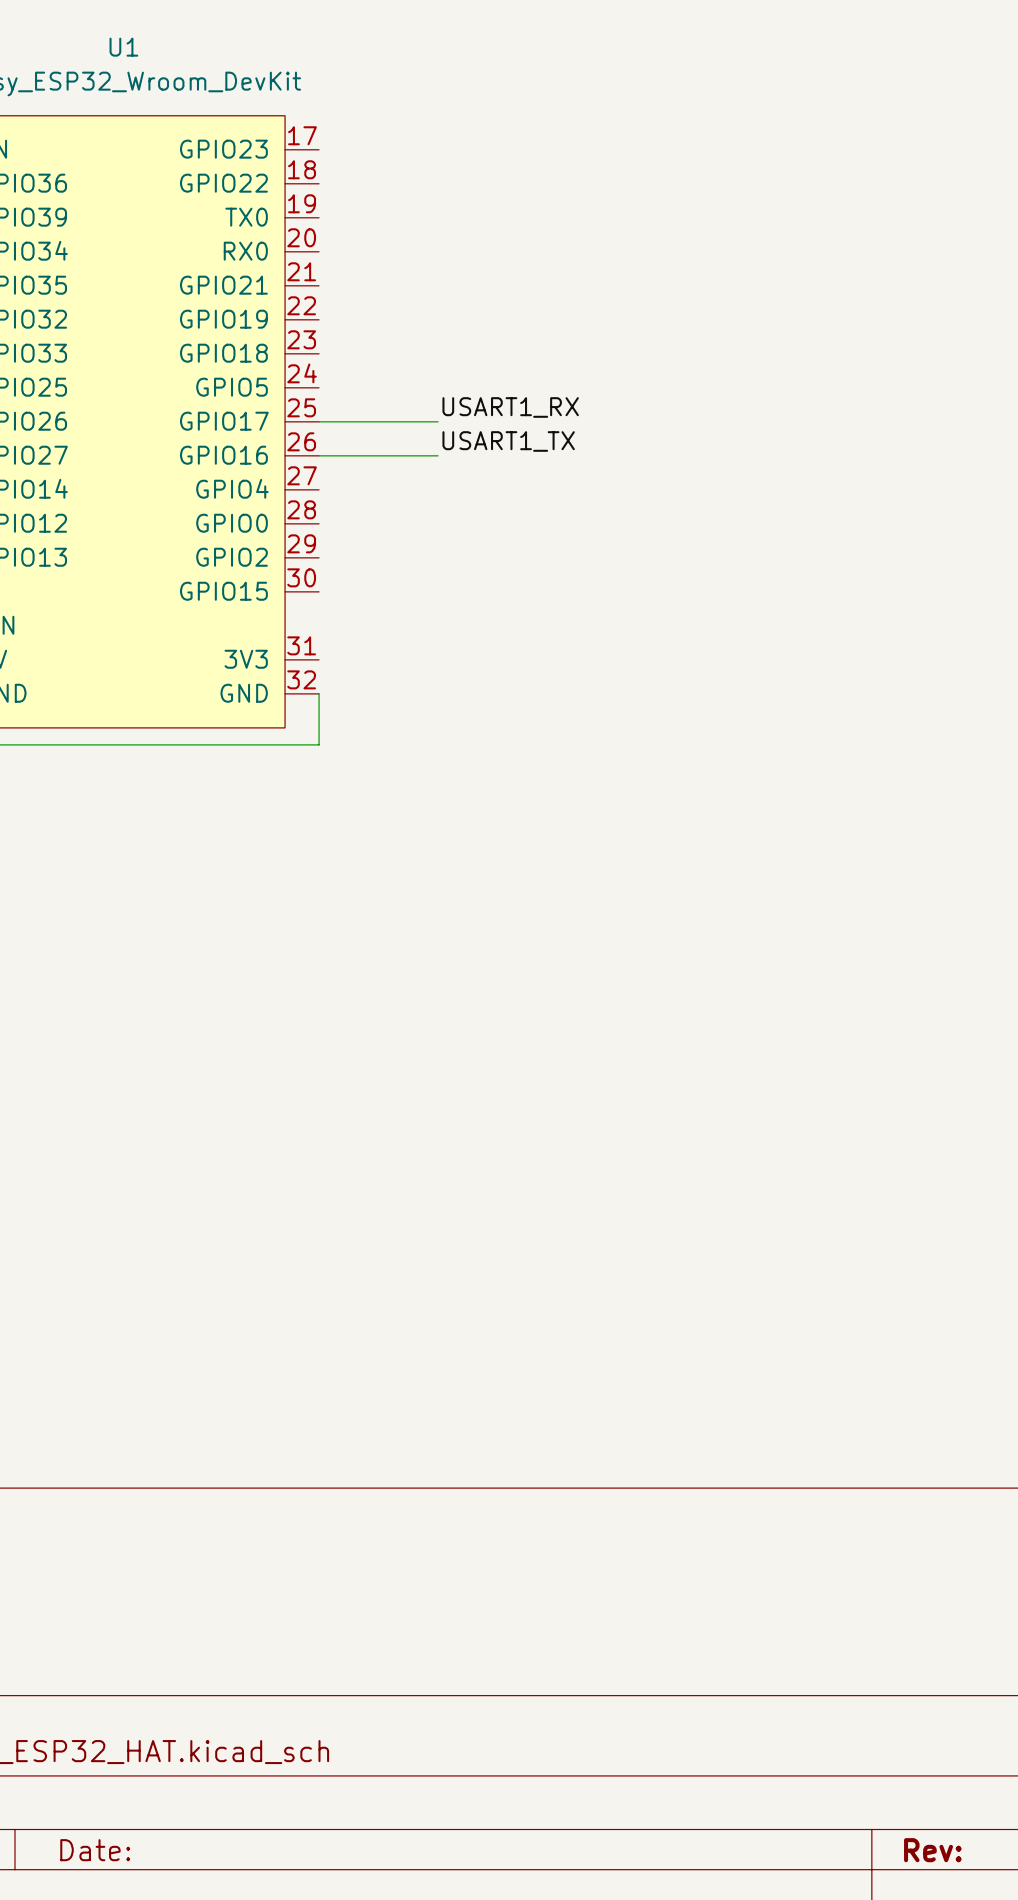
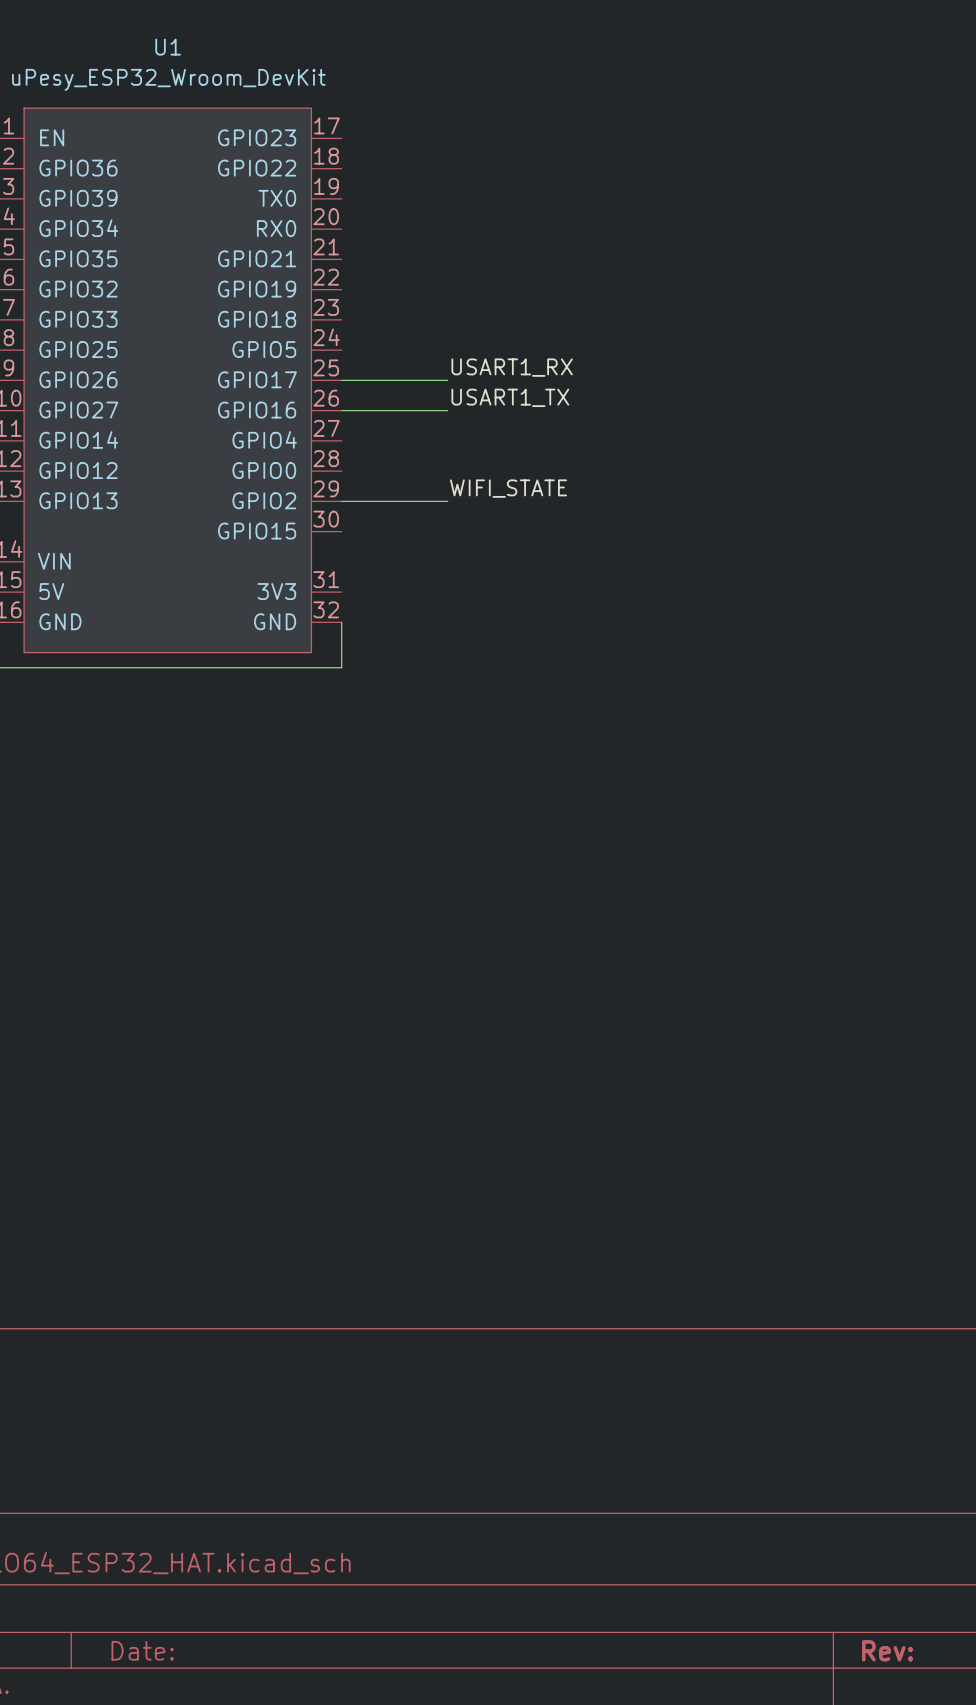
label: none -> WIFI_STATE (508, 488)
wire: none -> (341, 501) (447, 501)

